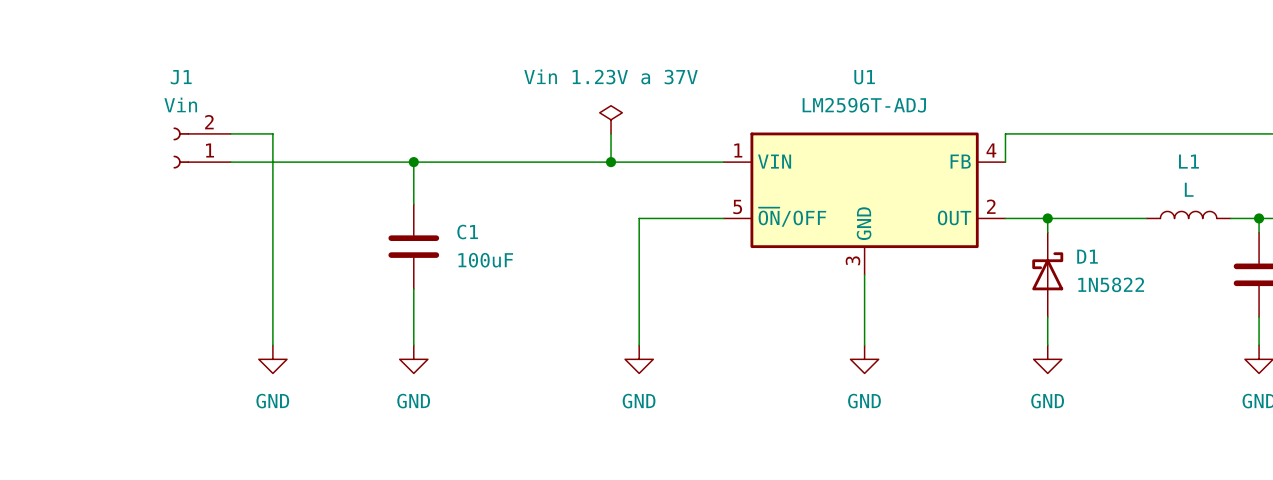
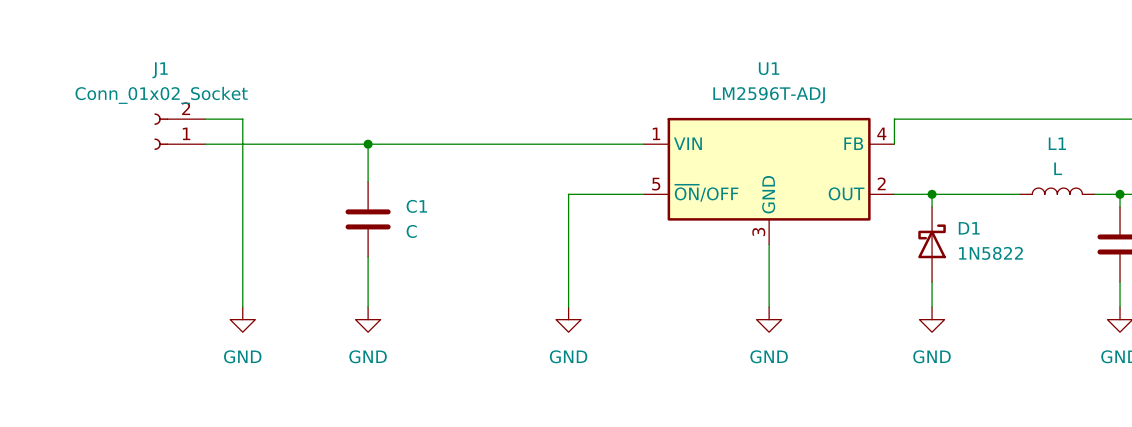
J1 value: Vin (180, 104) -> Conn_01x02_Socket (161, 95)
power symbol: Vin 1.23V a 37V (611, 119) -> none
wire: (611, 133) (611, 162) -> none
junction: (611, 162) -> none
C1 value: 100uF (485, 260) -> C (411, 231)

